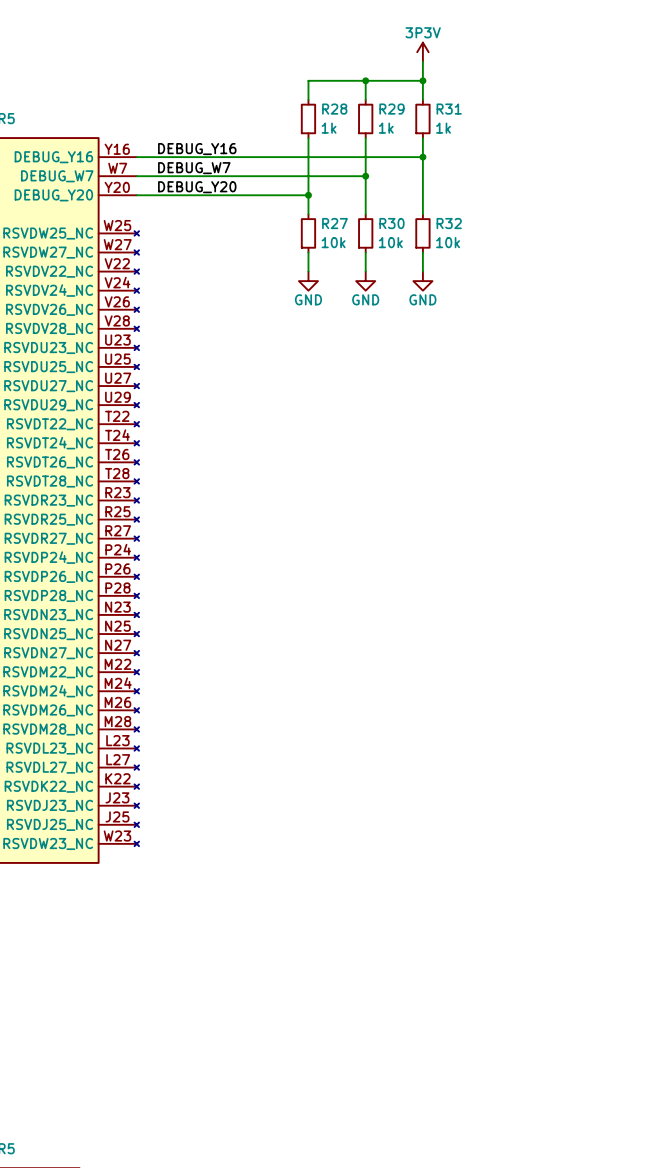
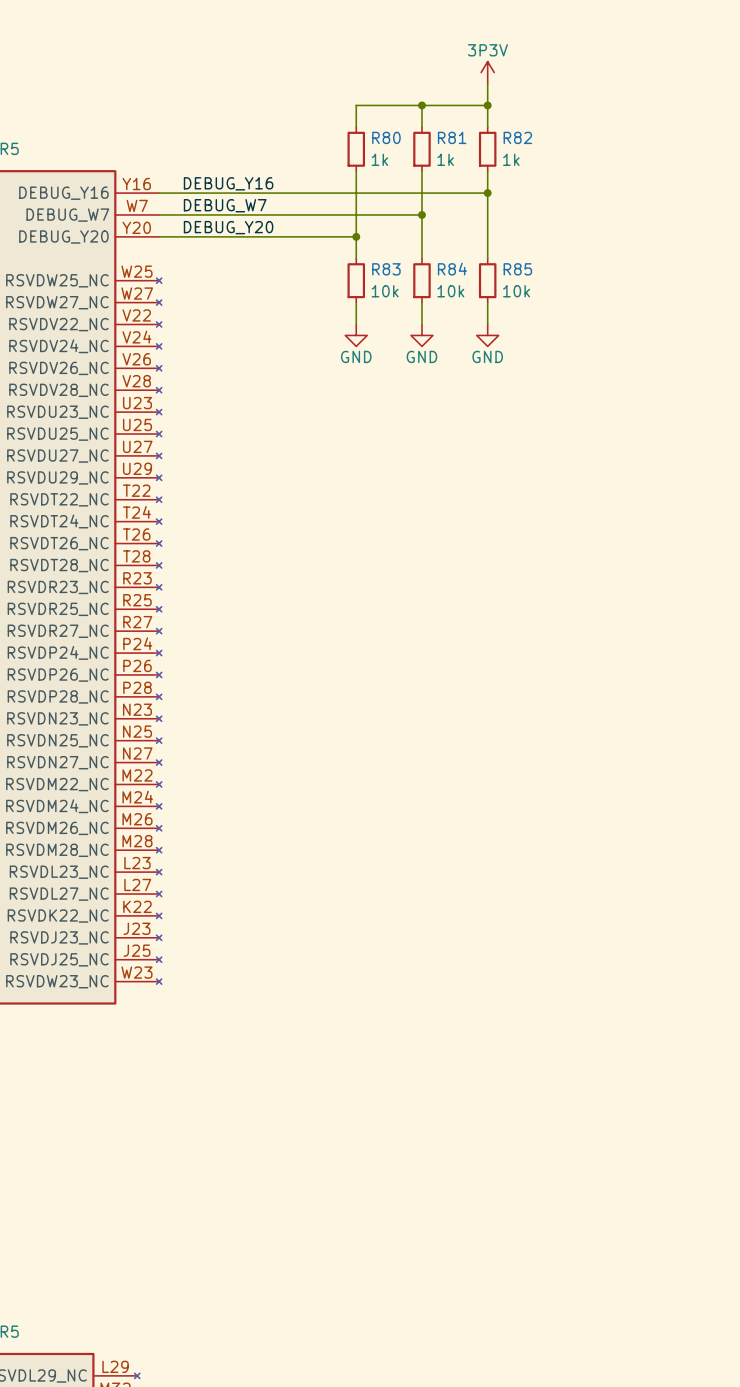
R28 name: R28 (334, 109) -> R80 (386, 137)
R29 name: R29 (391, 109) -> R81 (452, 137)
R31 name: R31 (449, 109) -> R82 (517, 137)
R27 name: R27 (334, 223) -> R83 (386, 269)
R30 name: R30 (391, 223) -> R84 (452, 269)
R32 name: R32 (449, 223) -> R85 (517, 269)

